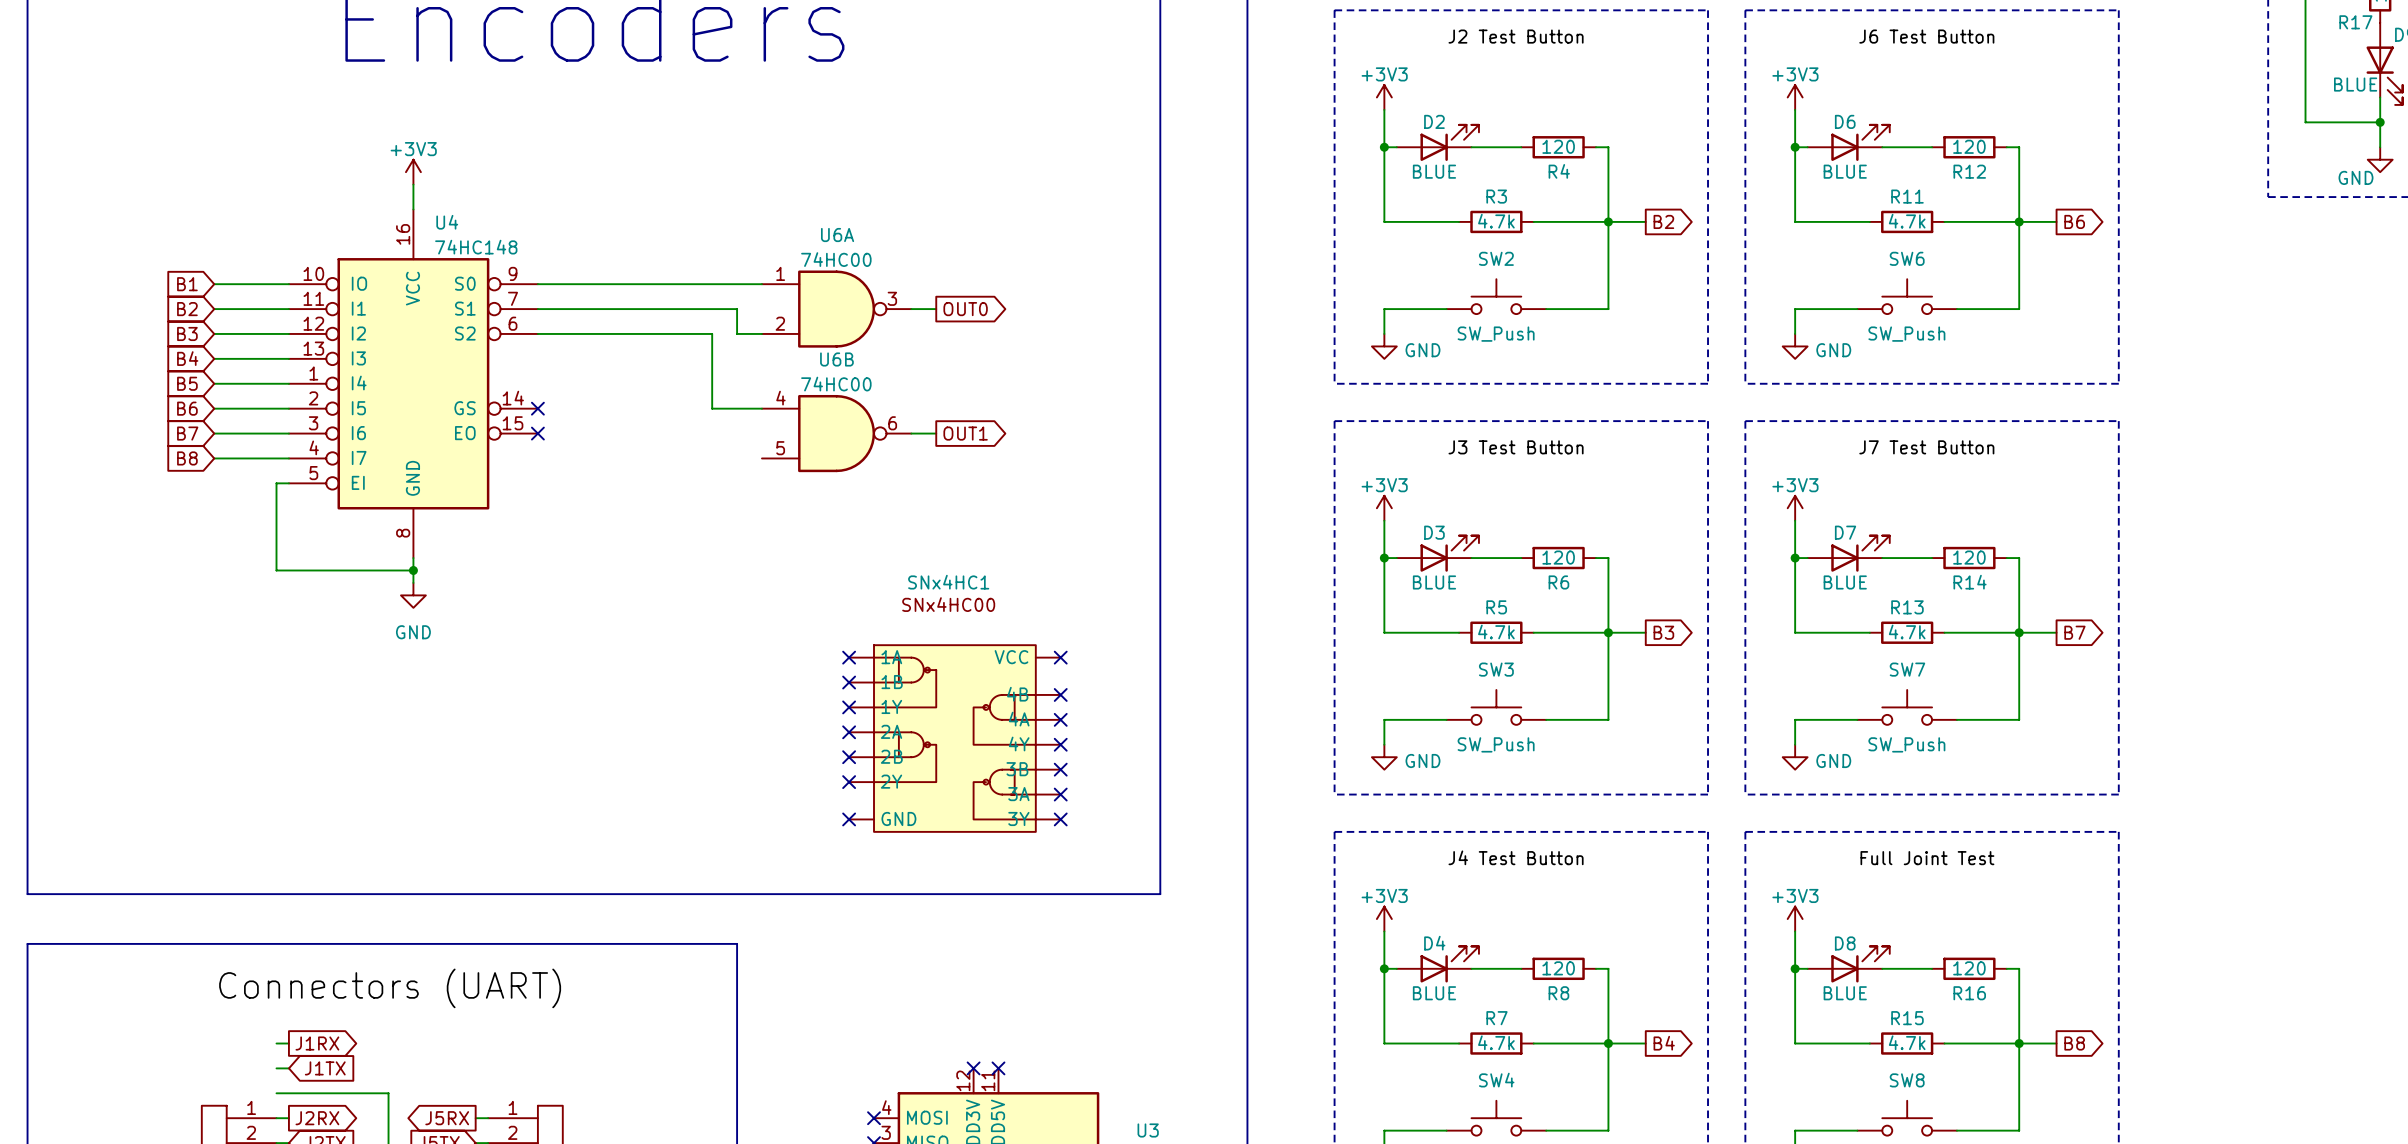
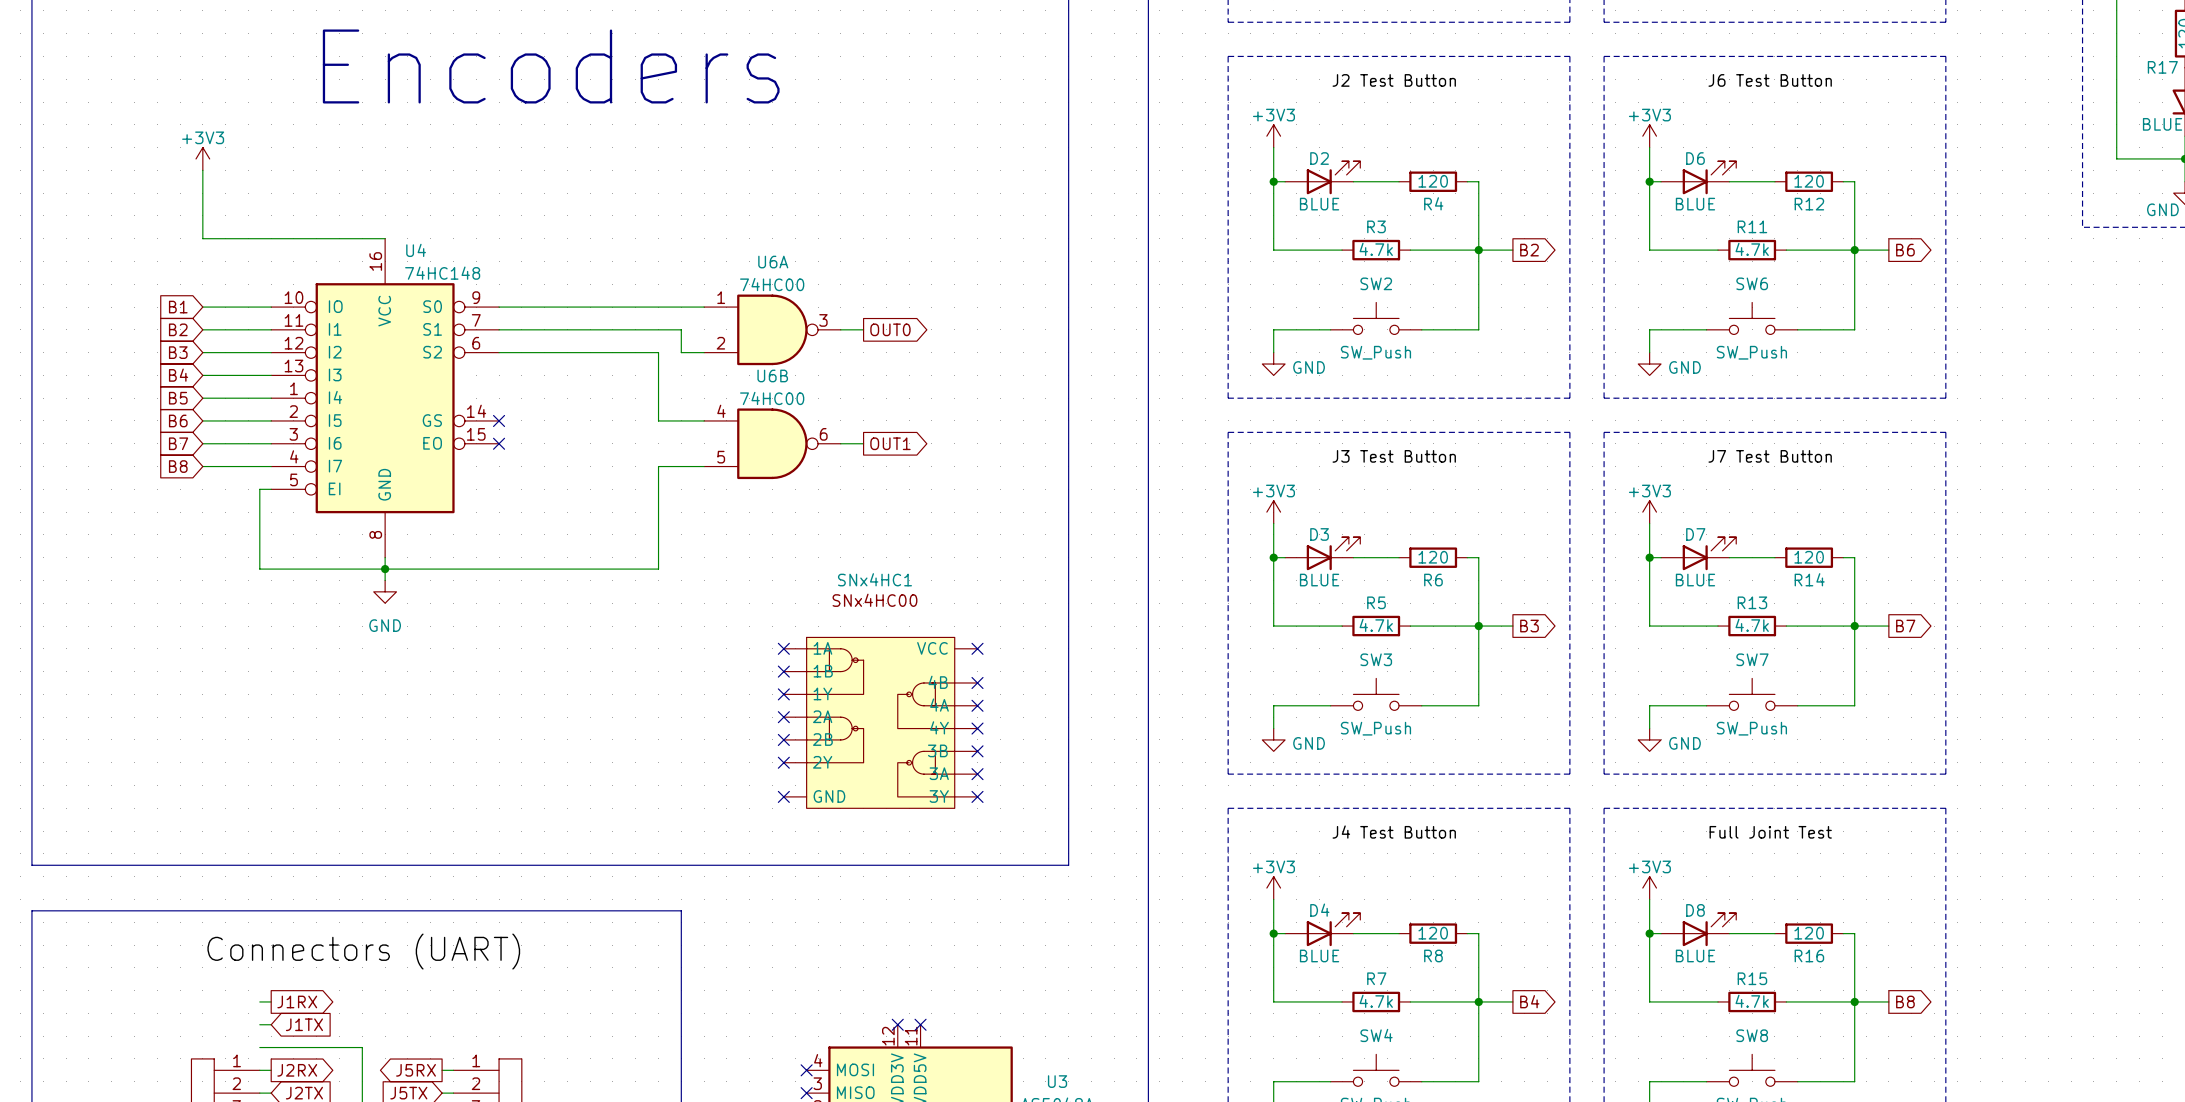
power symbol position: +3V3 (413, 172) -> +3V3 (202, 158)
wire: (413, 184) (413, 209) -> (202, 170) (202, 238) (385, 238)
wire: none -> (704, 466) (658, 466) (658, 569) (385, 569)

